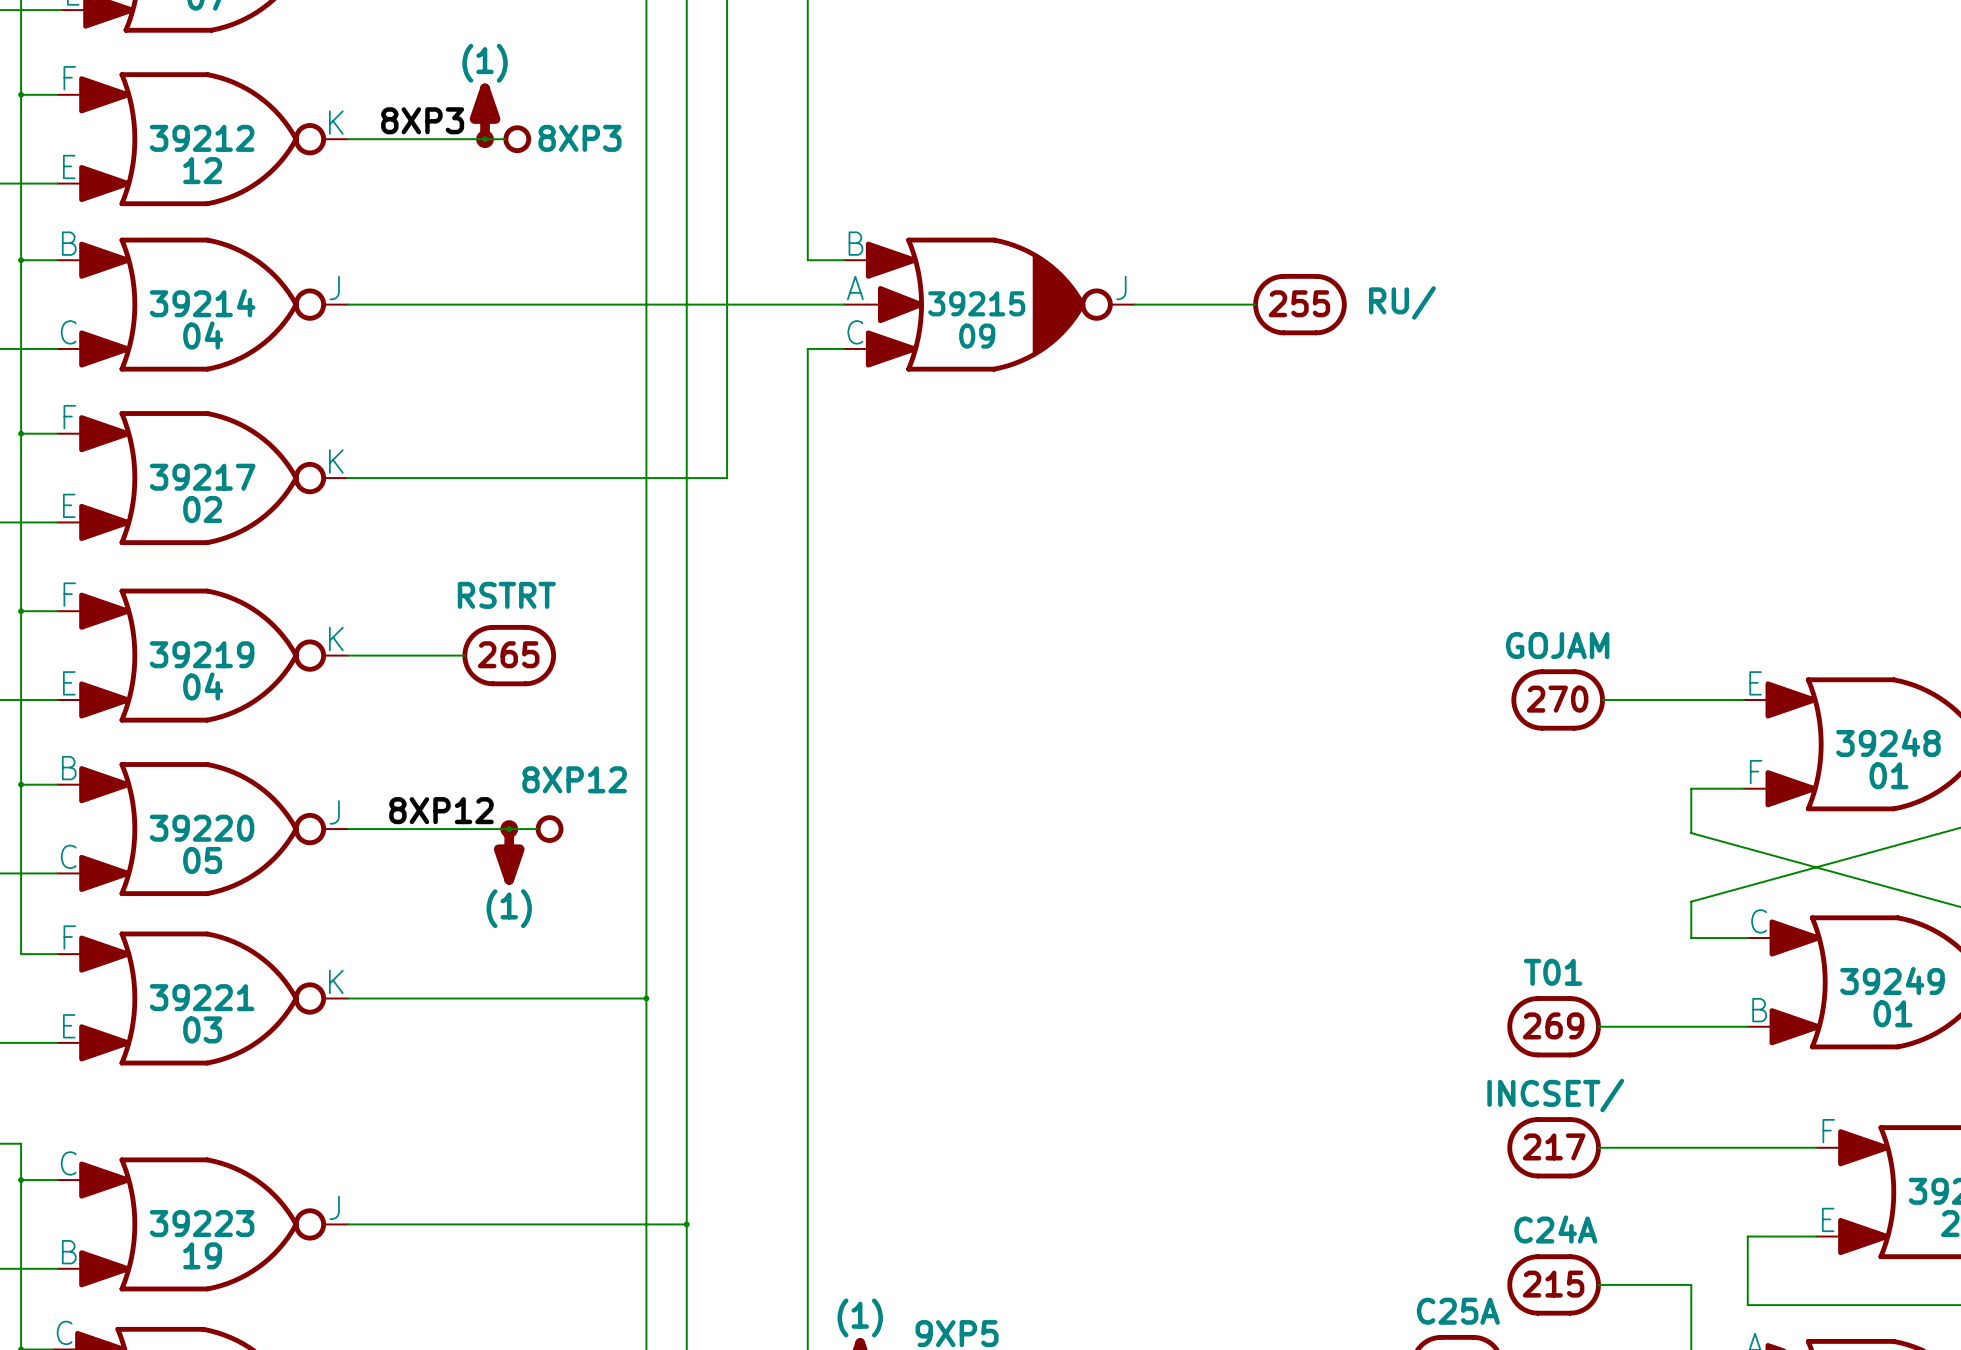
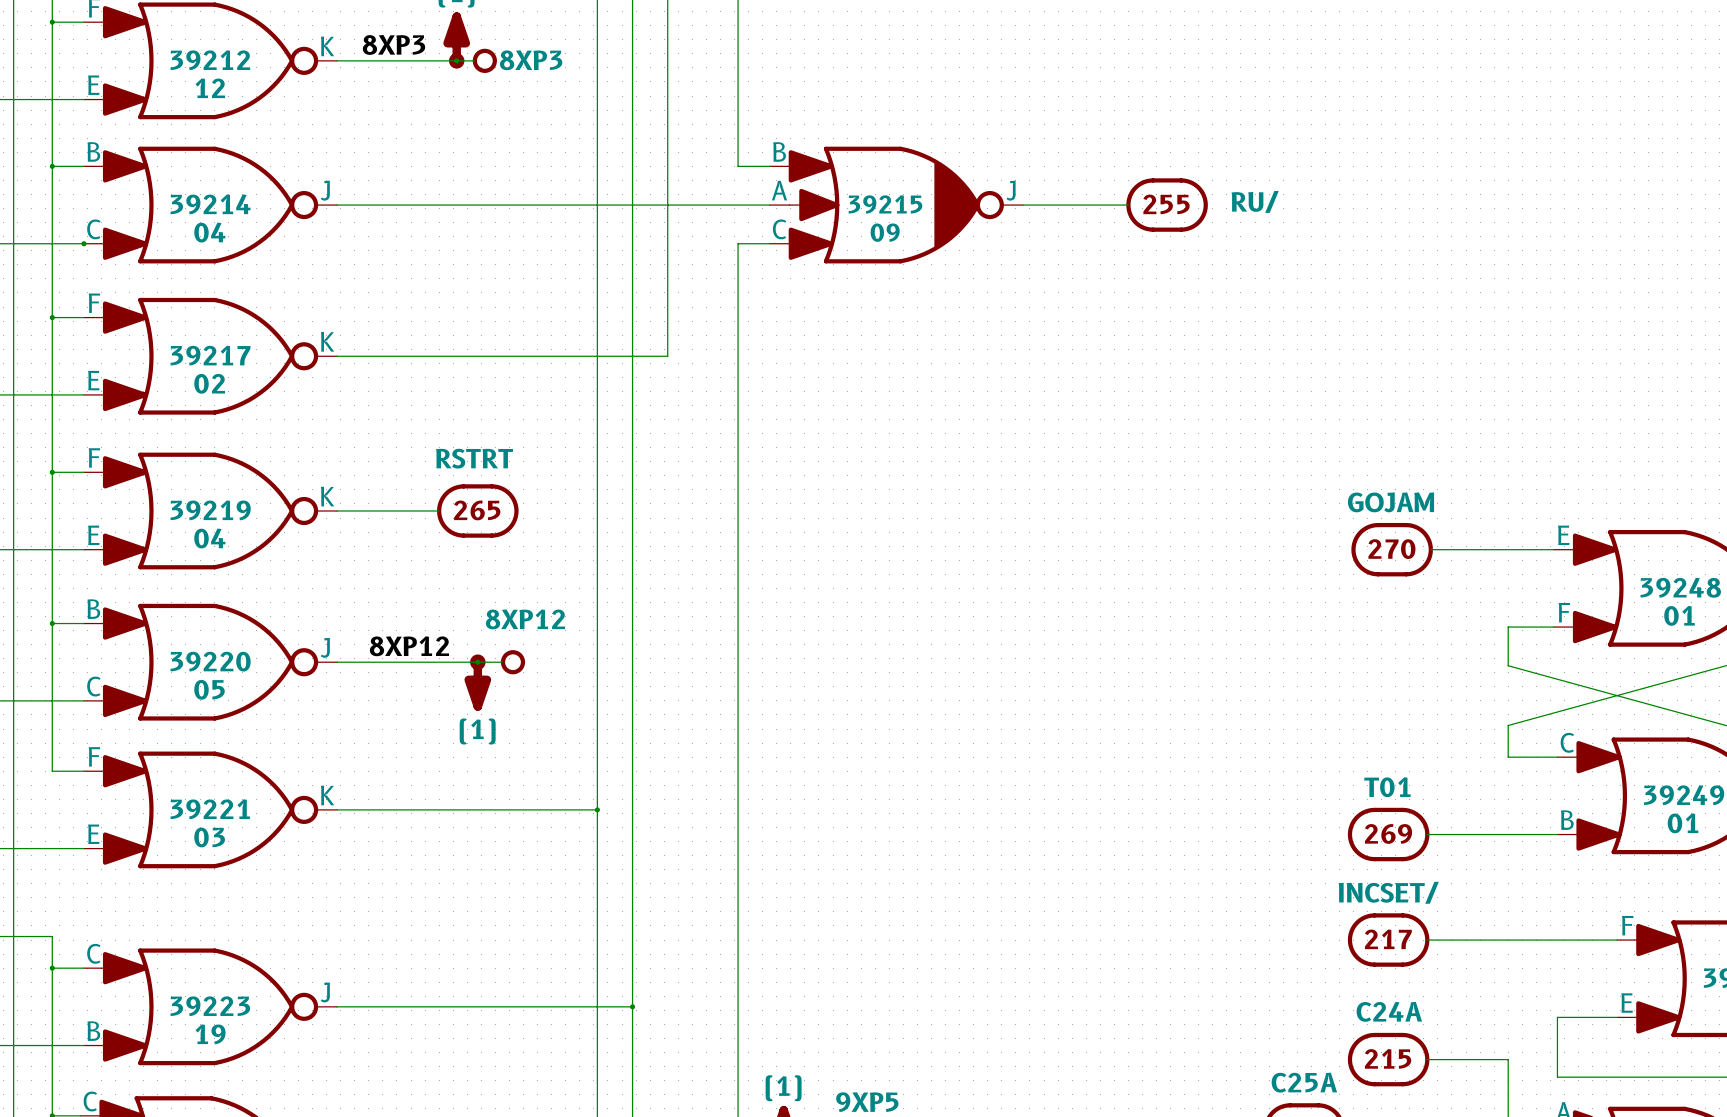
junction: none -> (83, 243)

